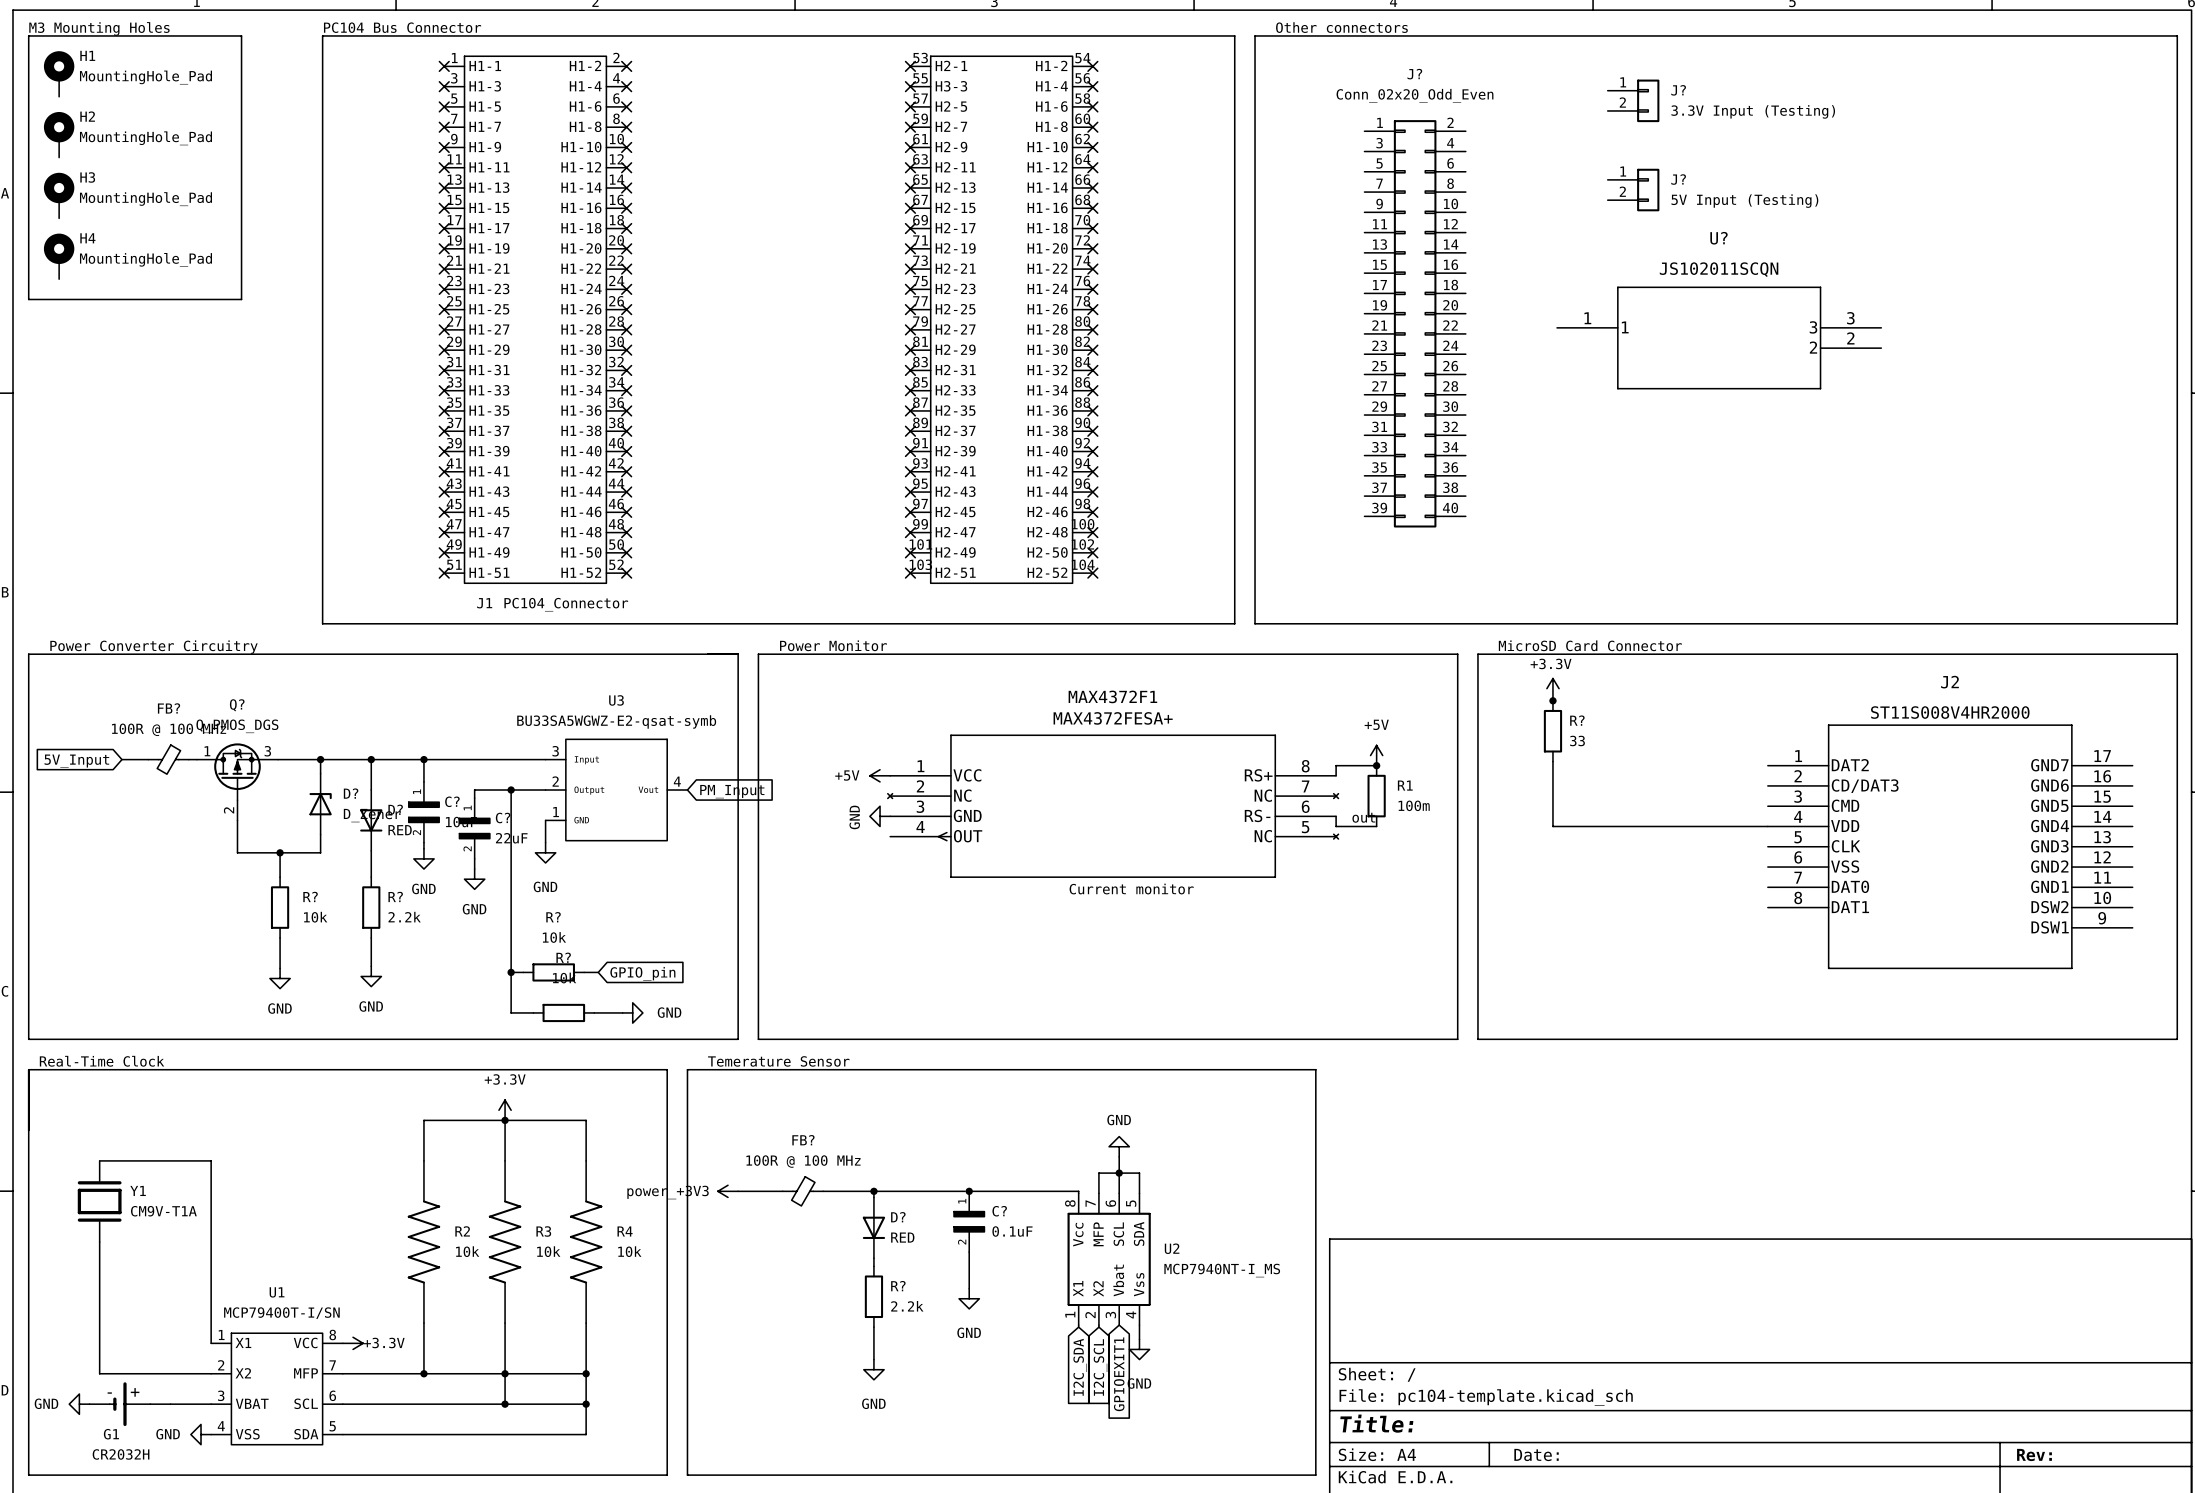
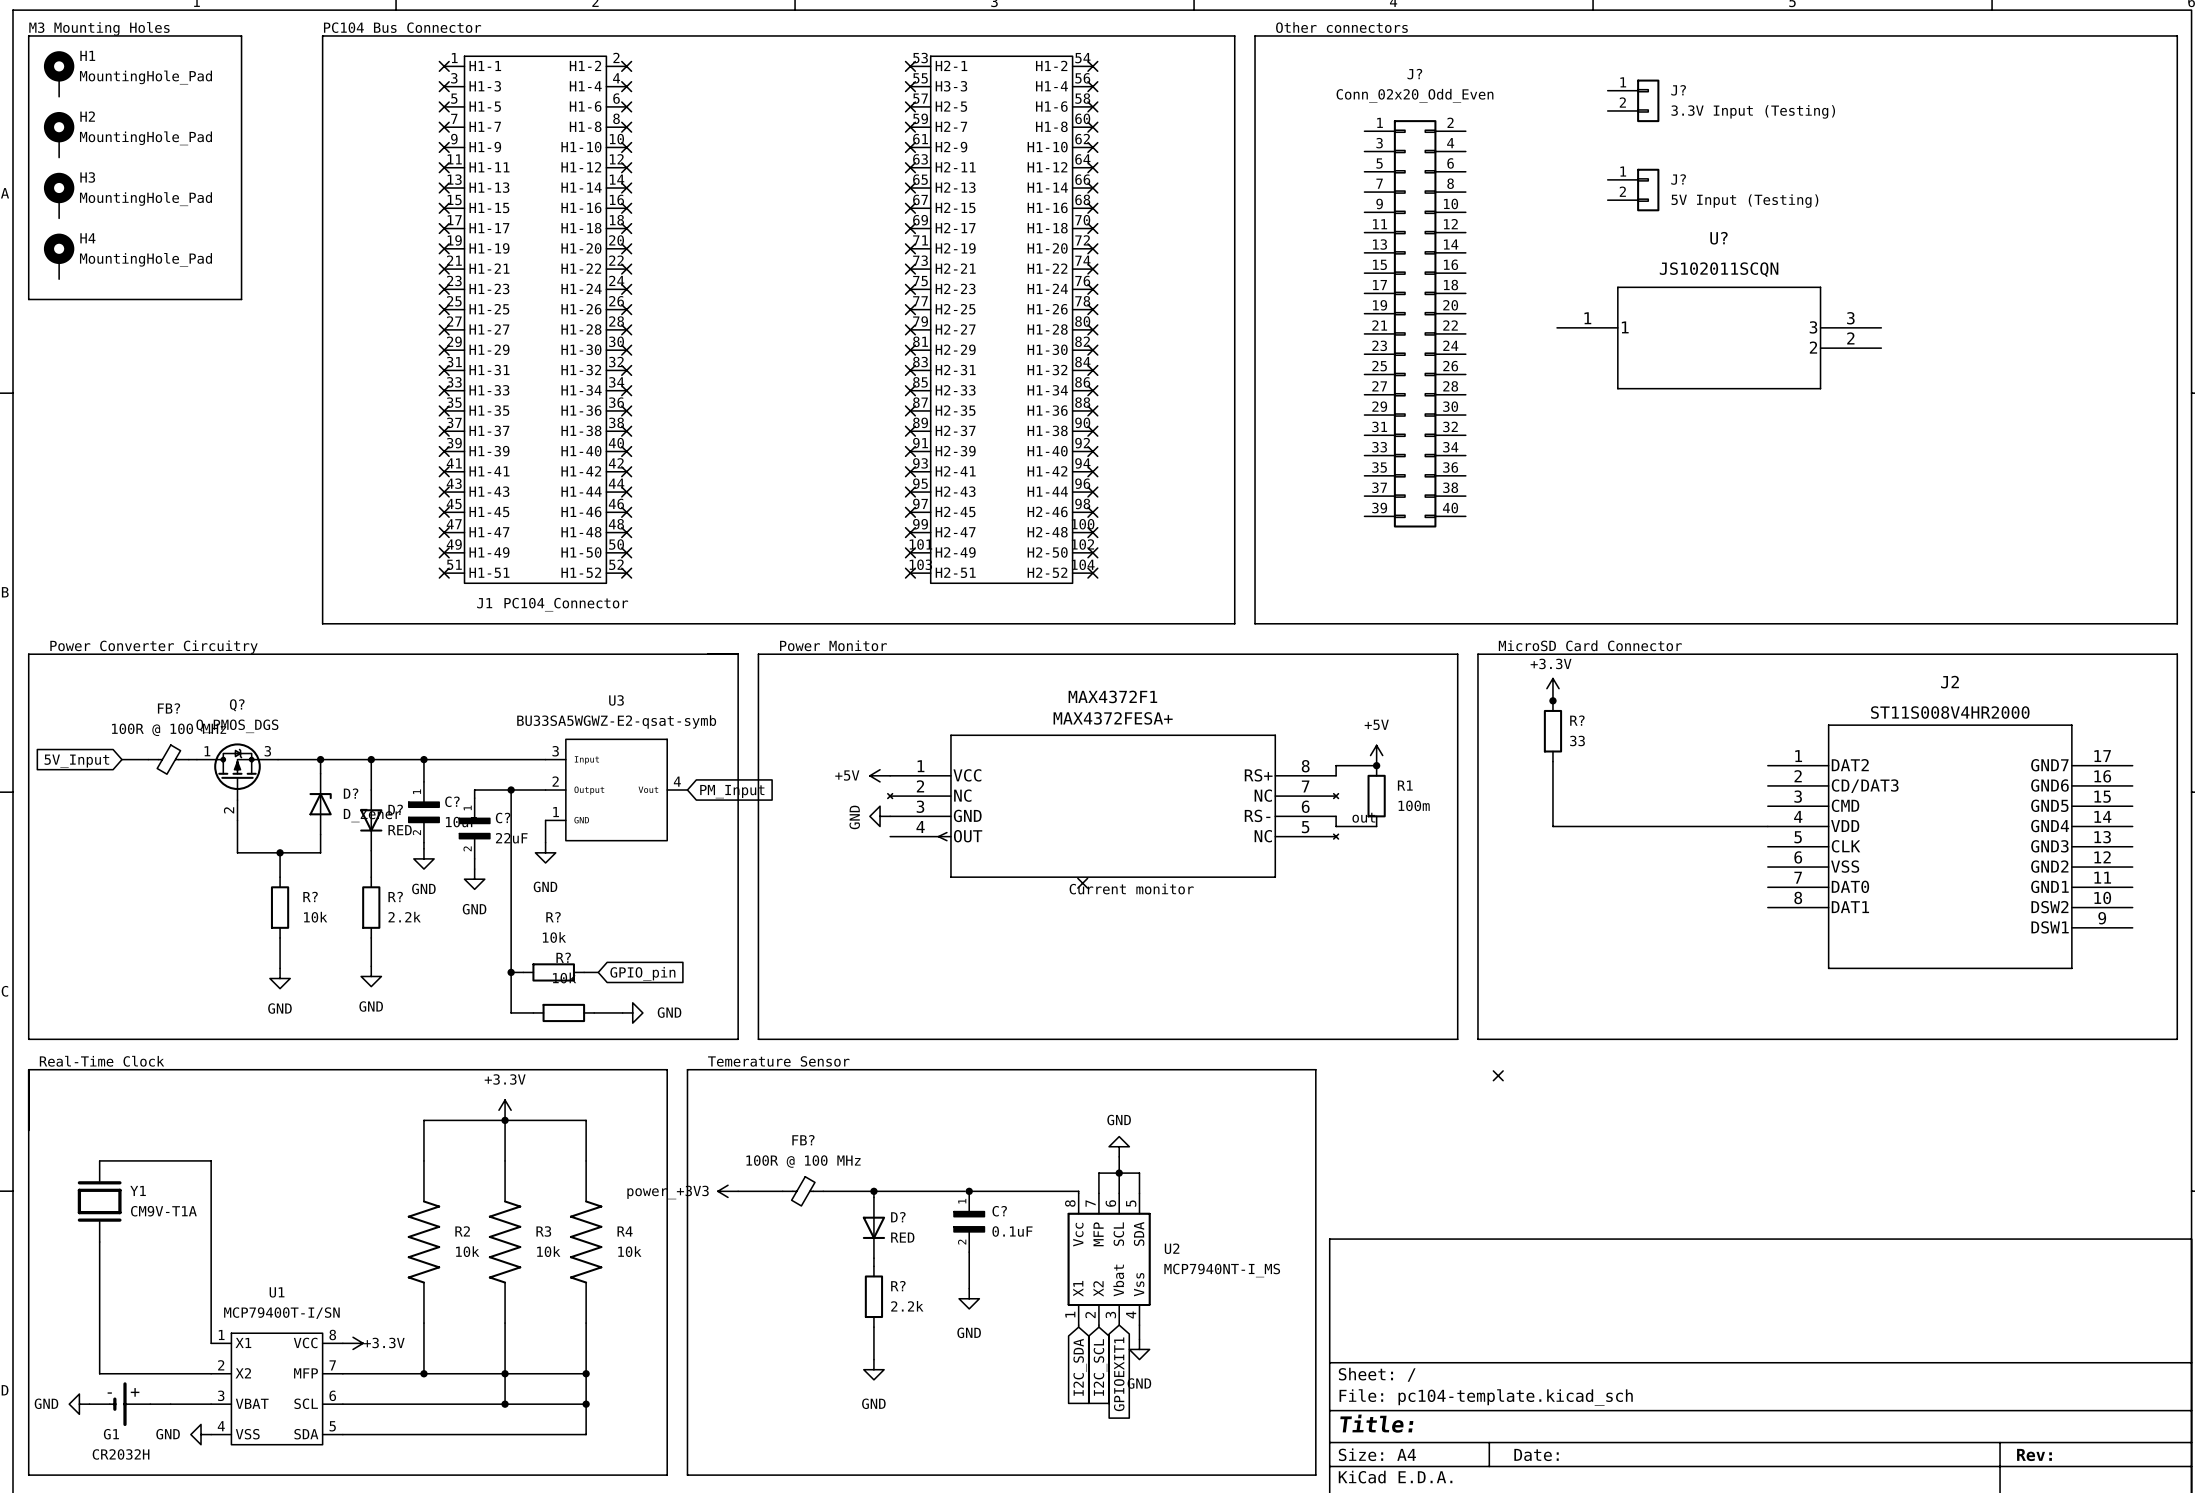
no-connect mark: none -> (1082, 883)
no-connect mark: none -> (1498, 1075)

